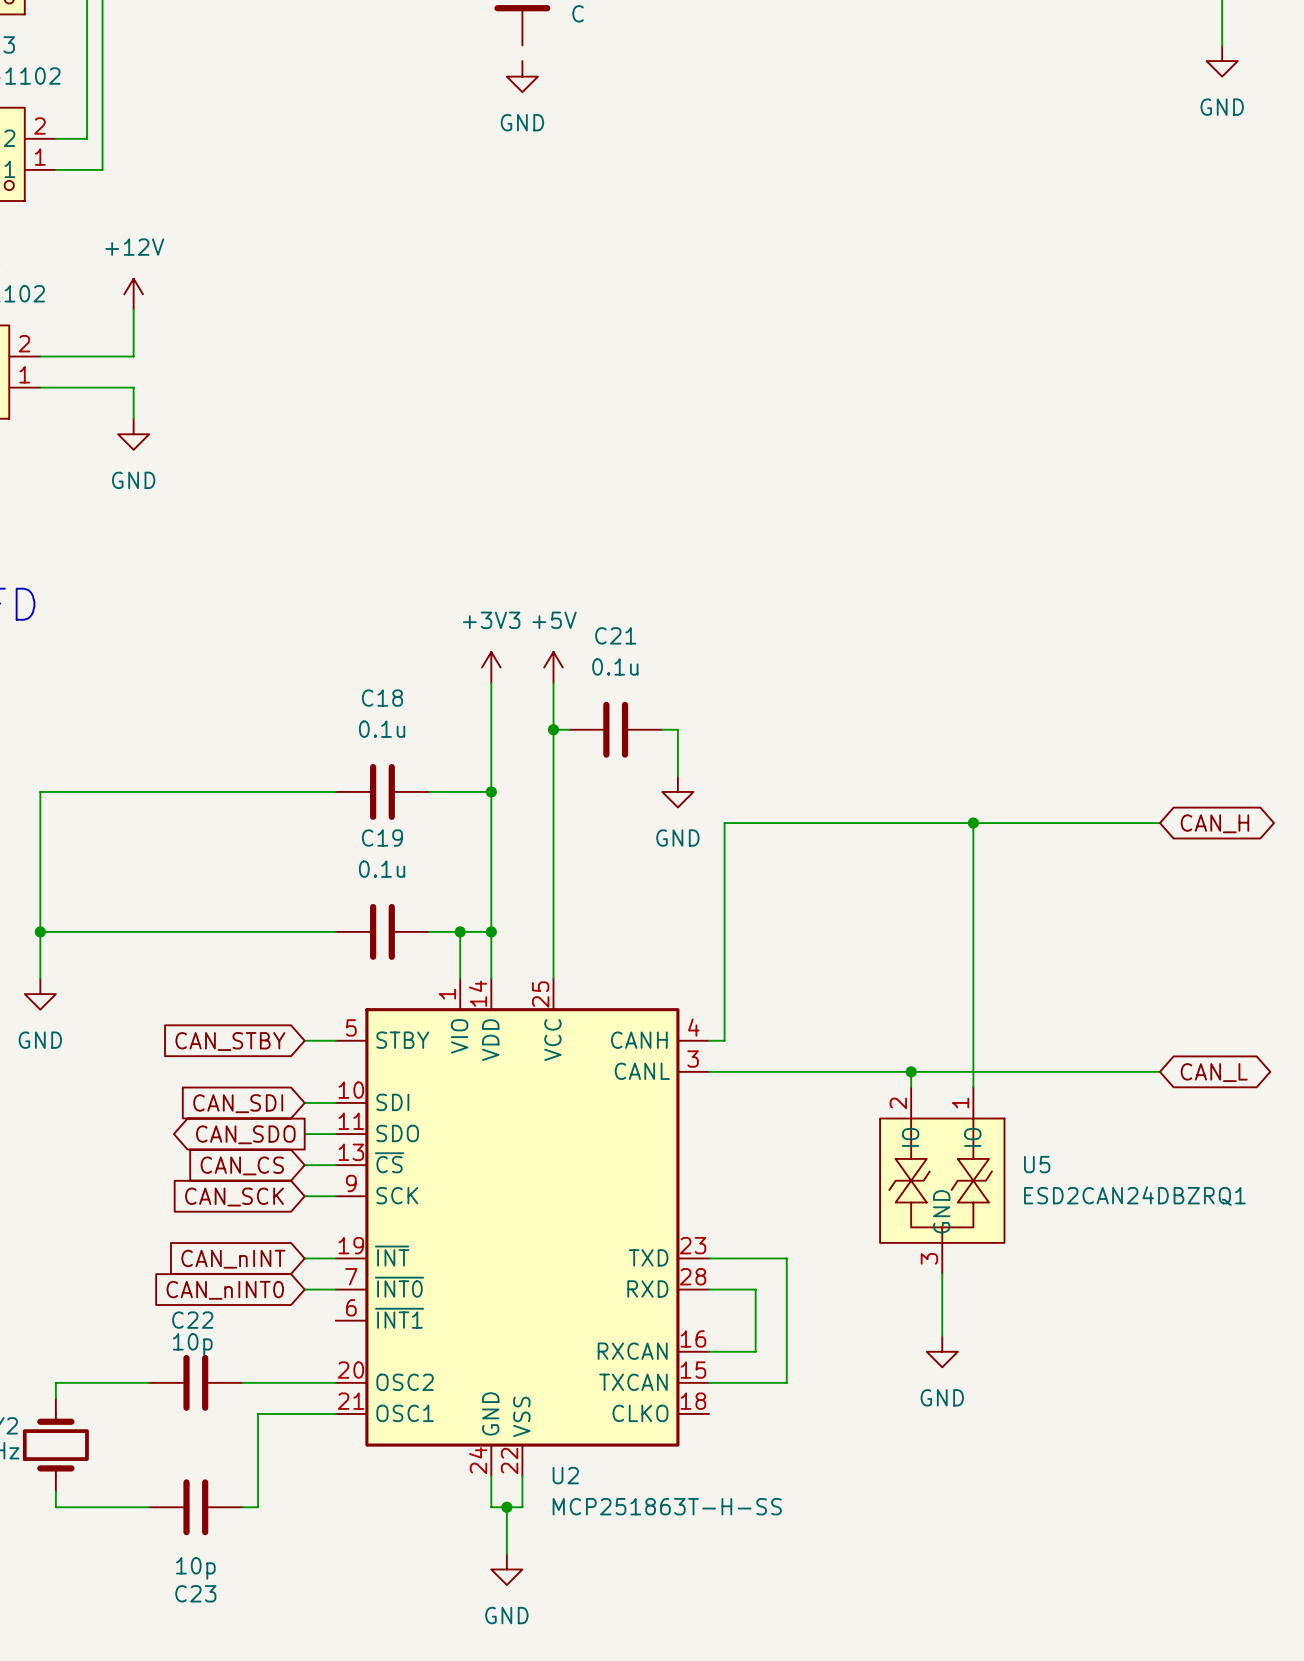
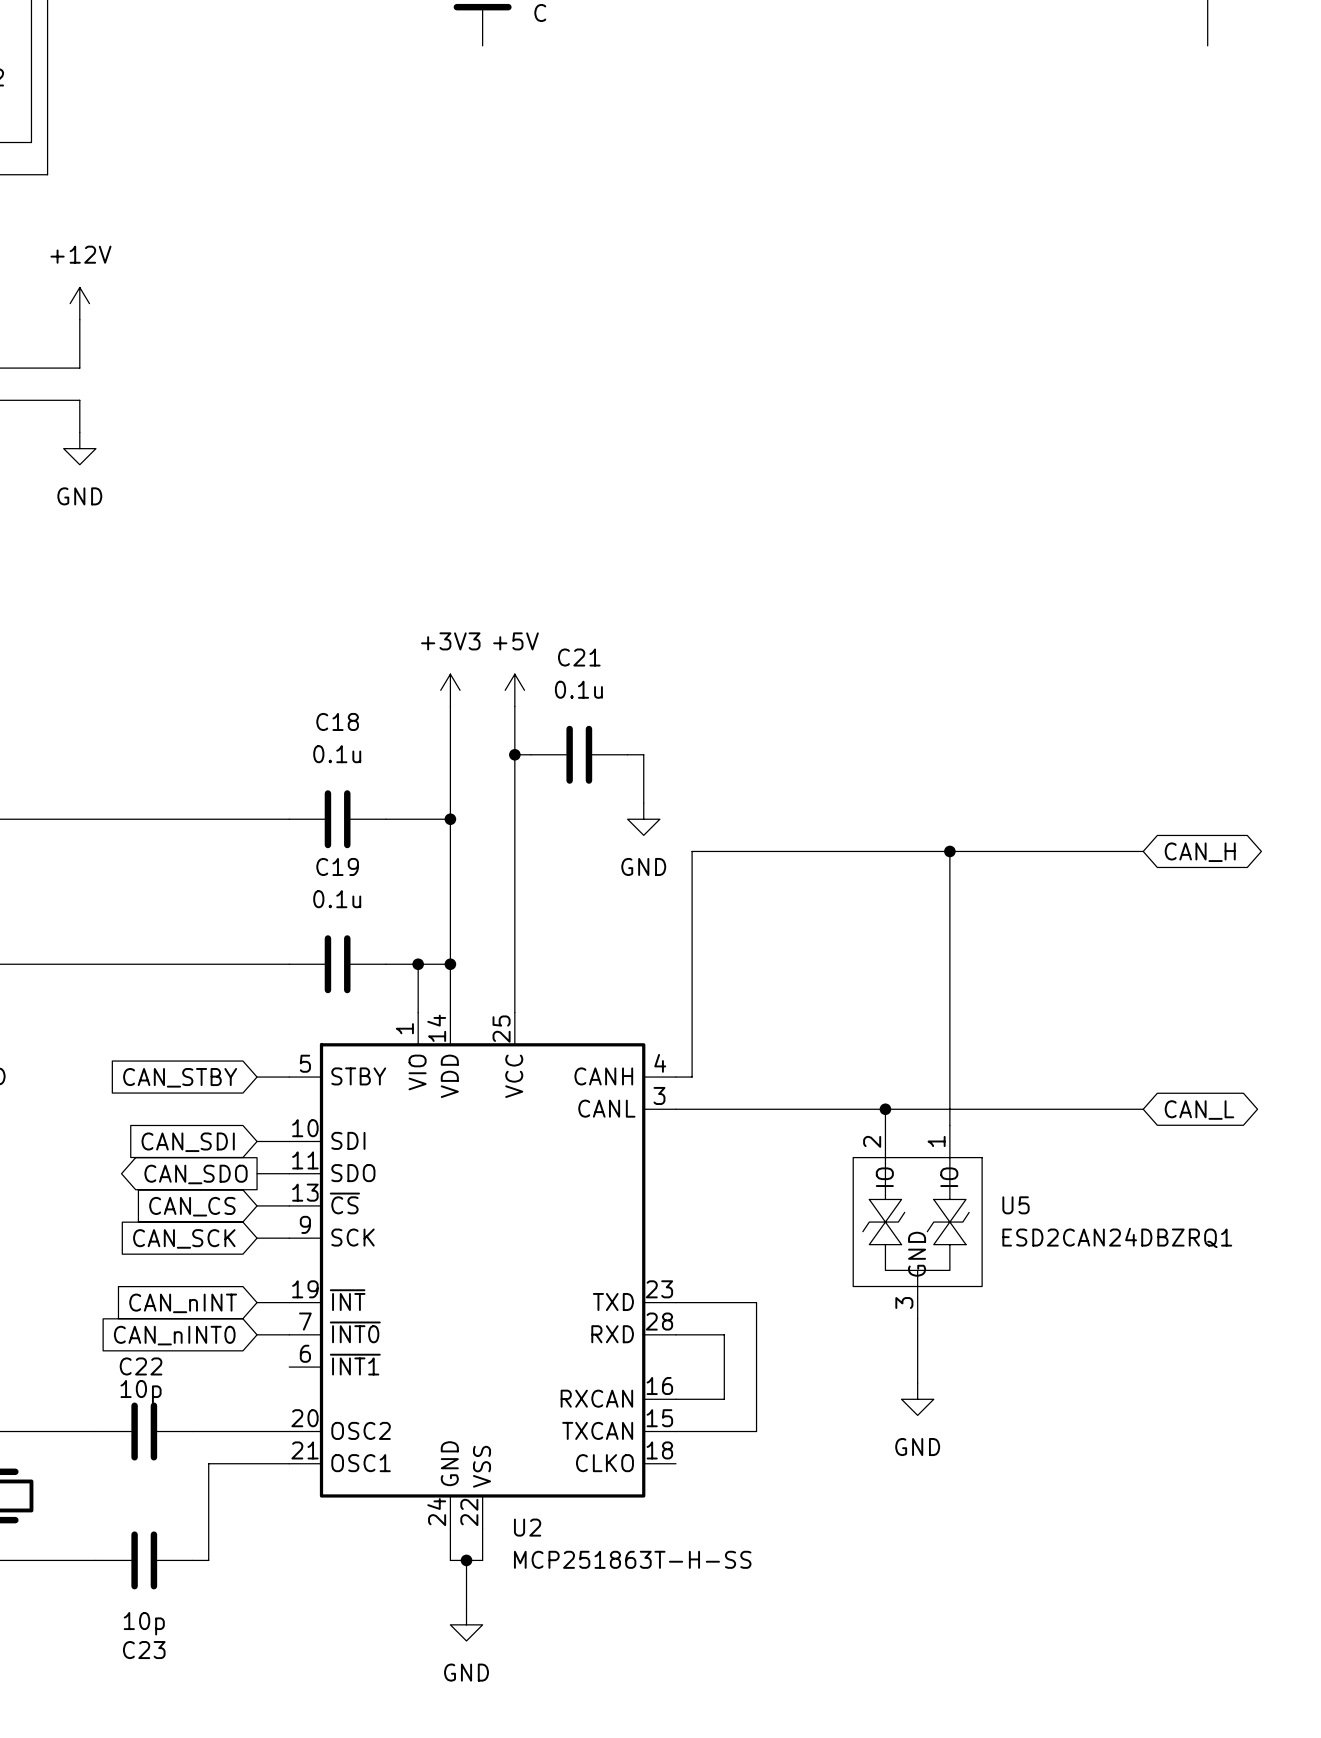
power symbol: GND (1222, 61) -> none
power symbol: GND (522, 76) -> none

